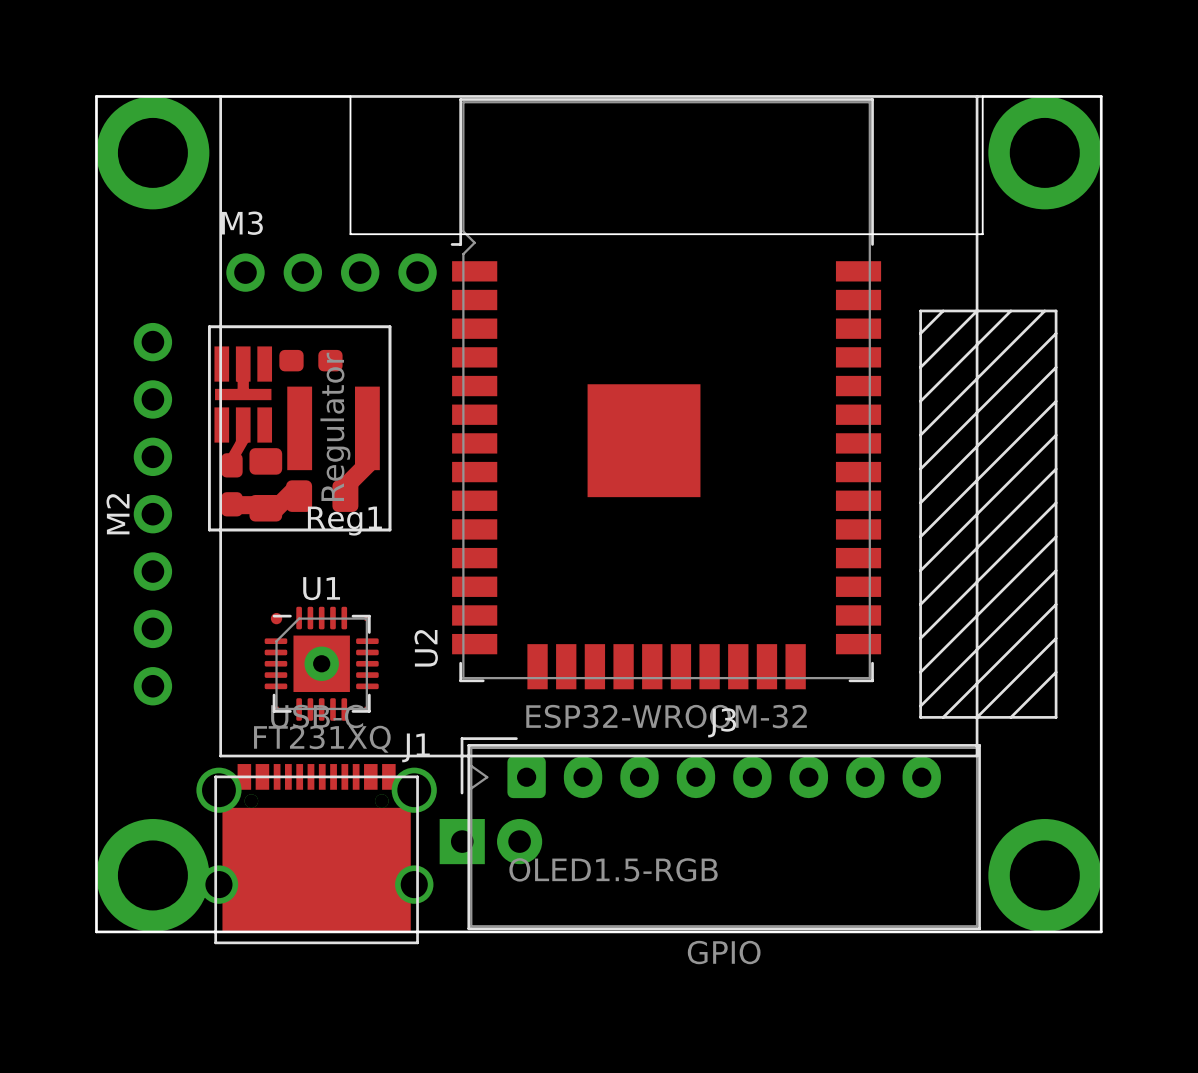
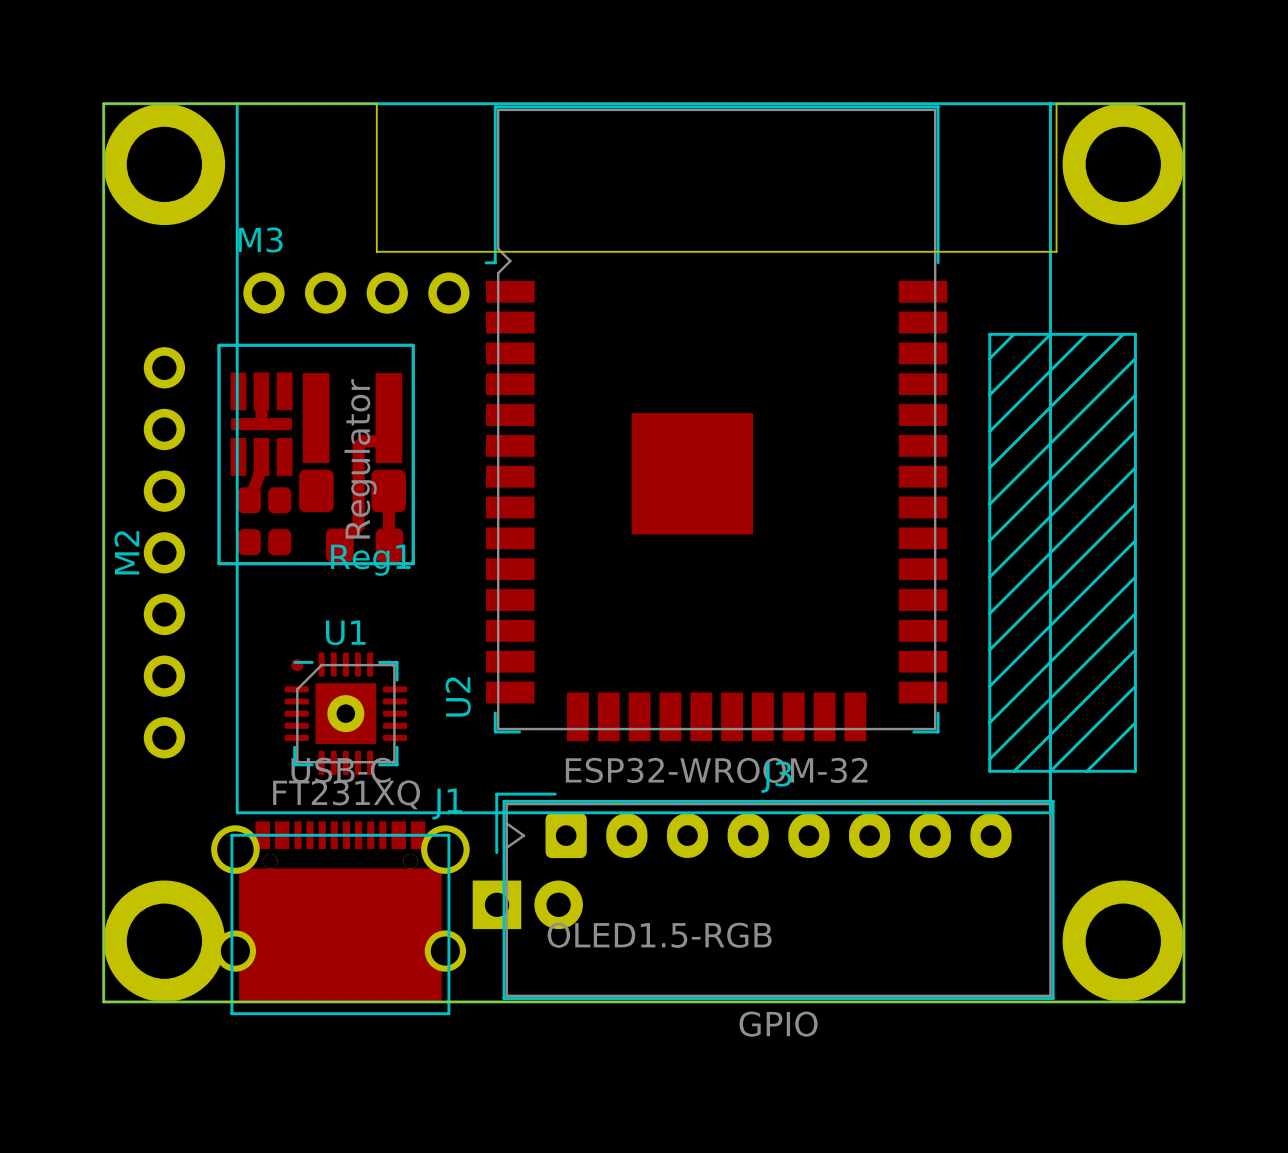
Reg1 footprint: [208, 325, 392, 532] -> [217, 343, 415, 566]

